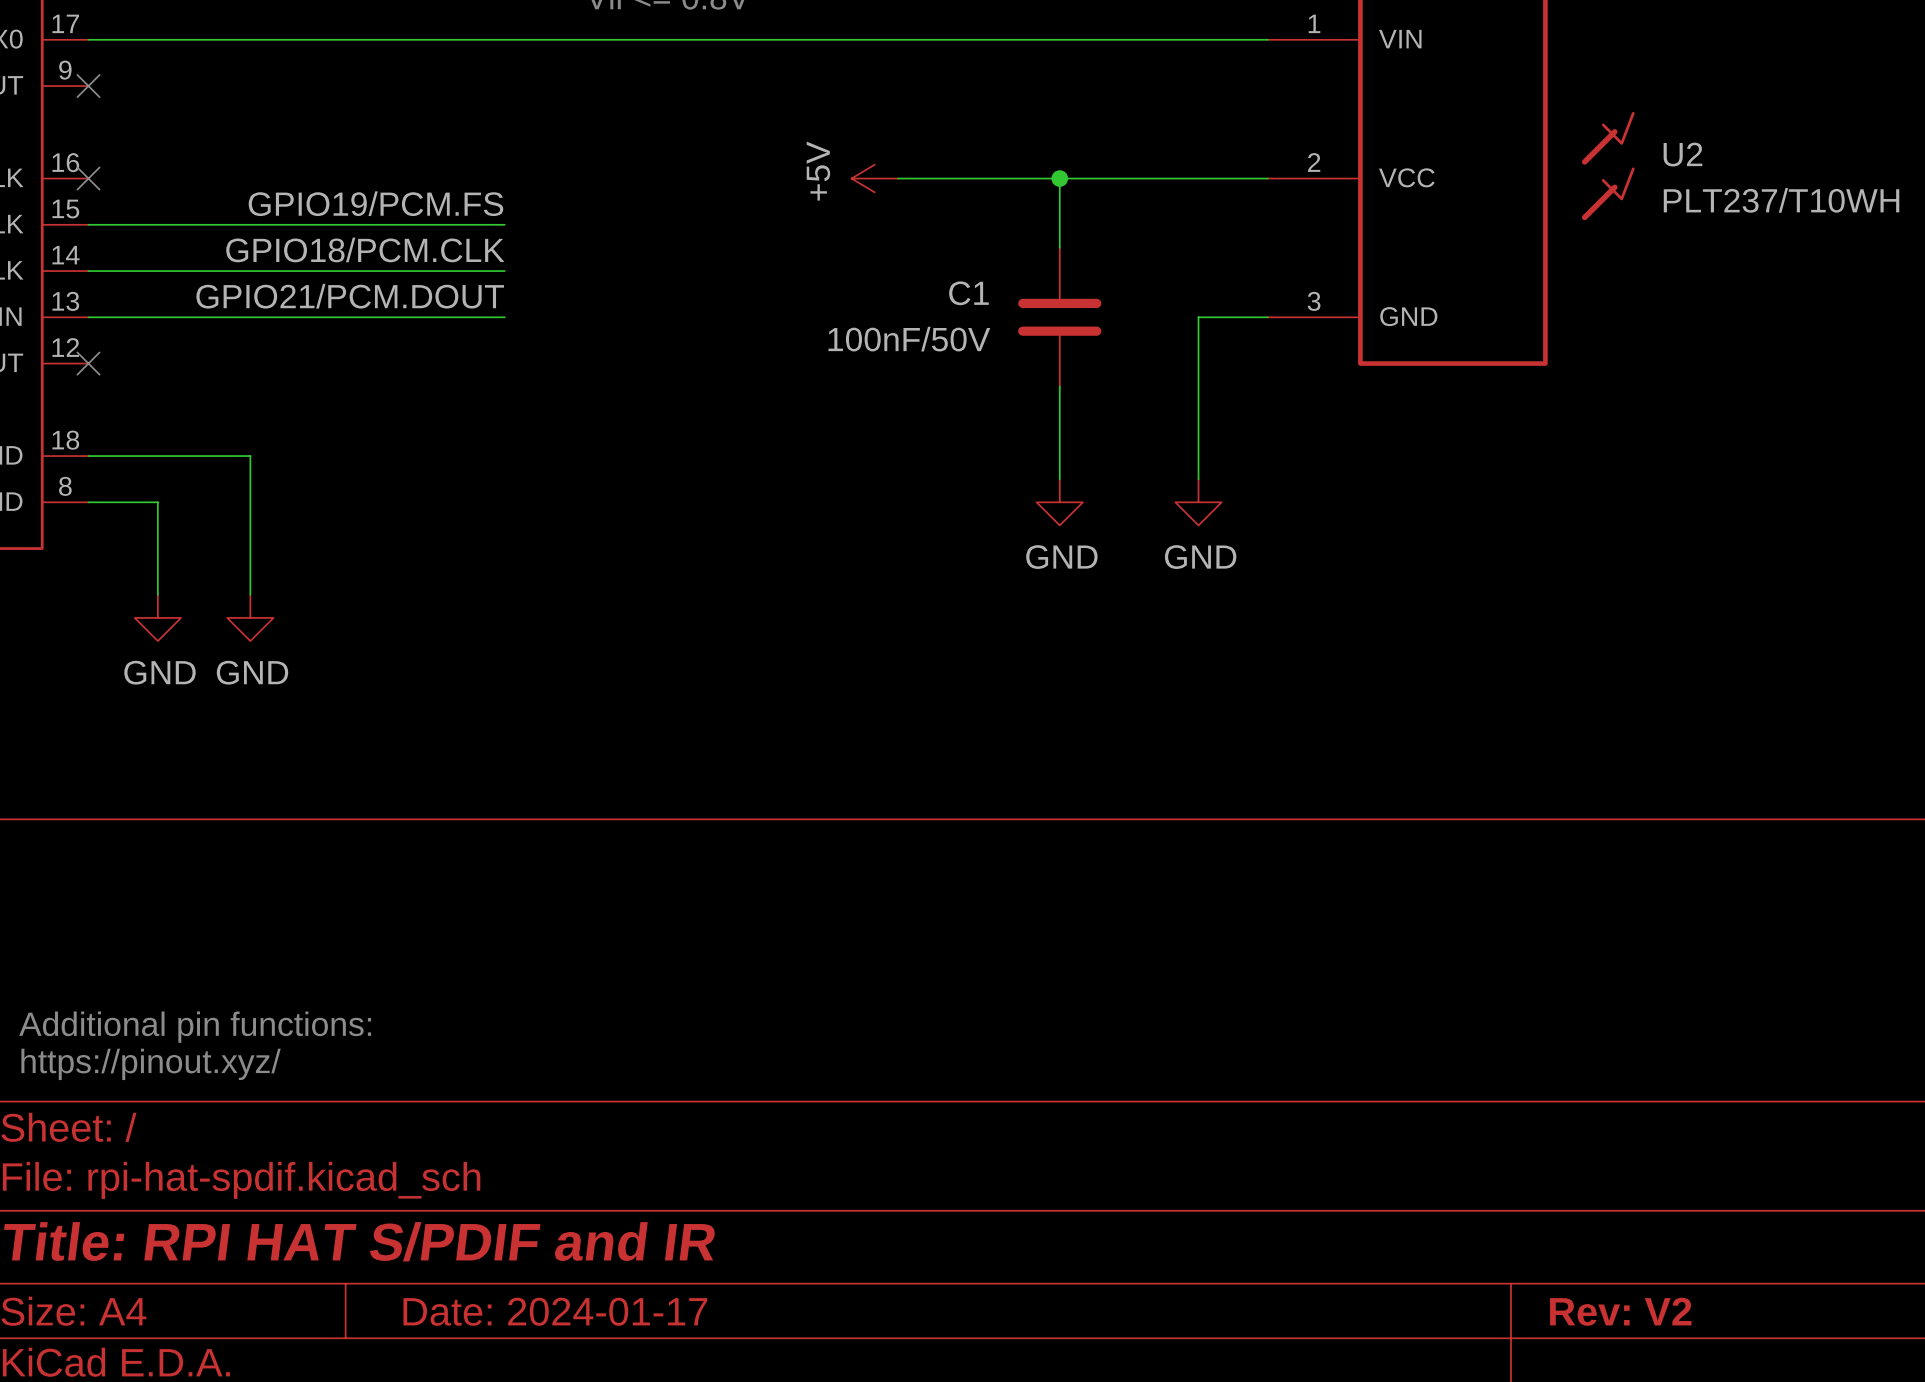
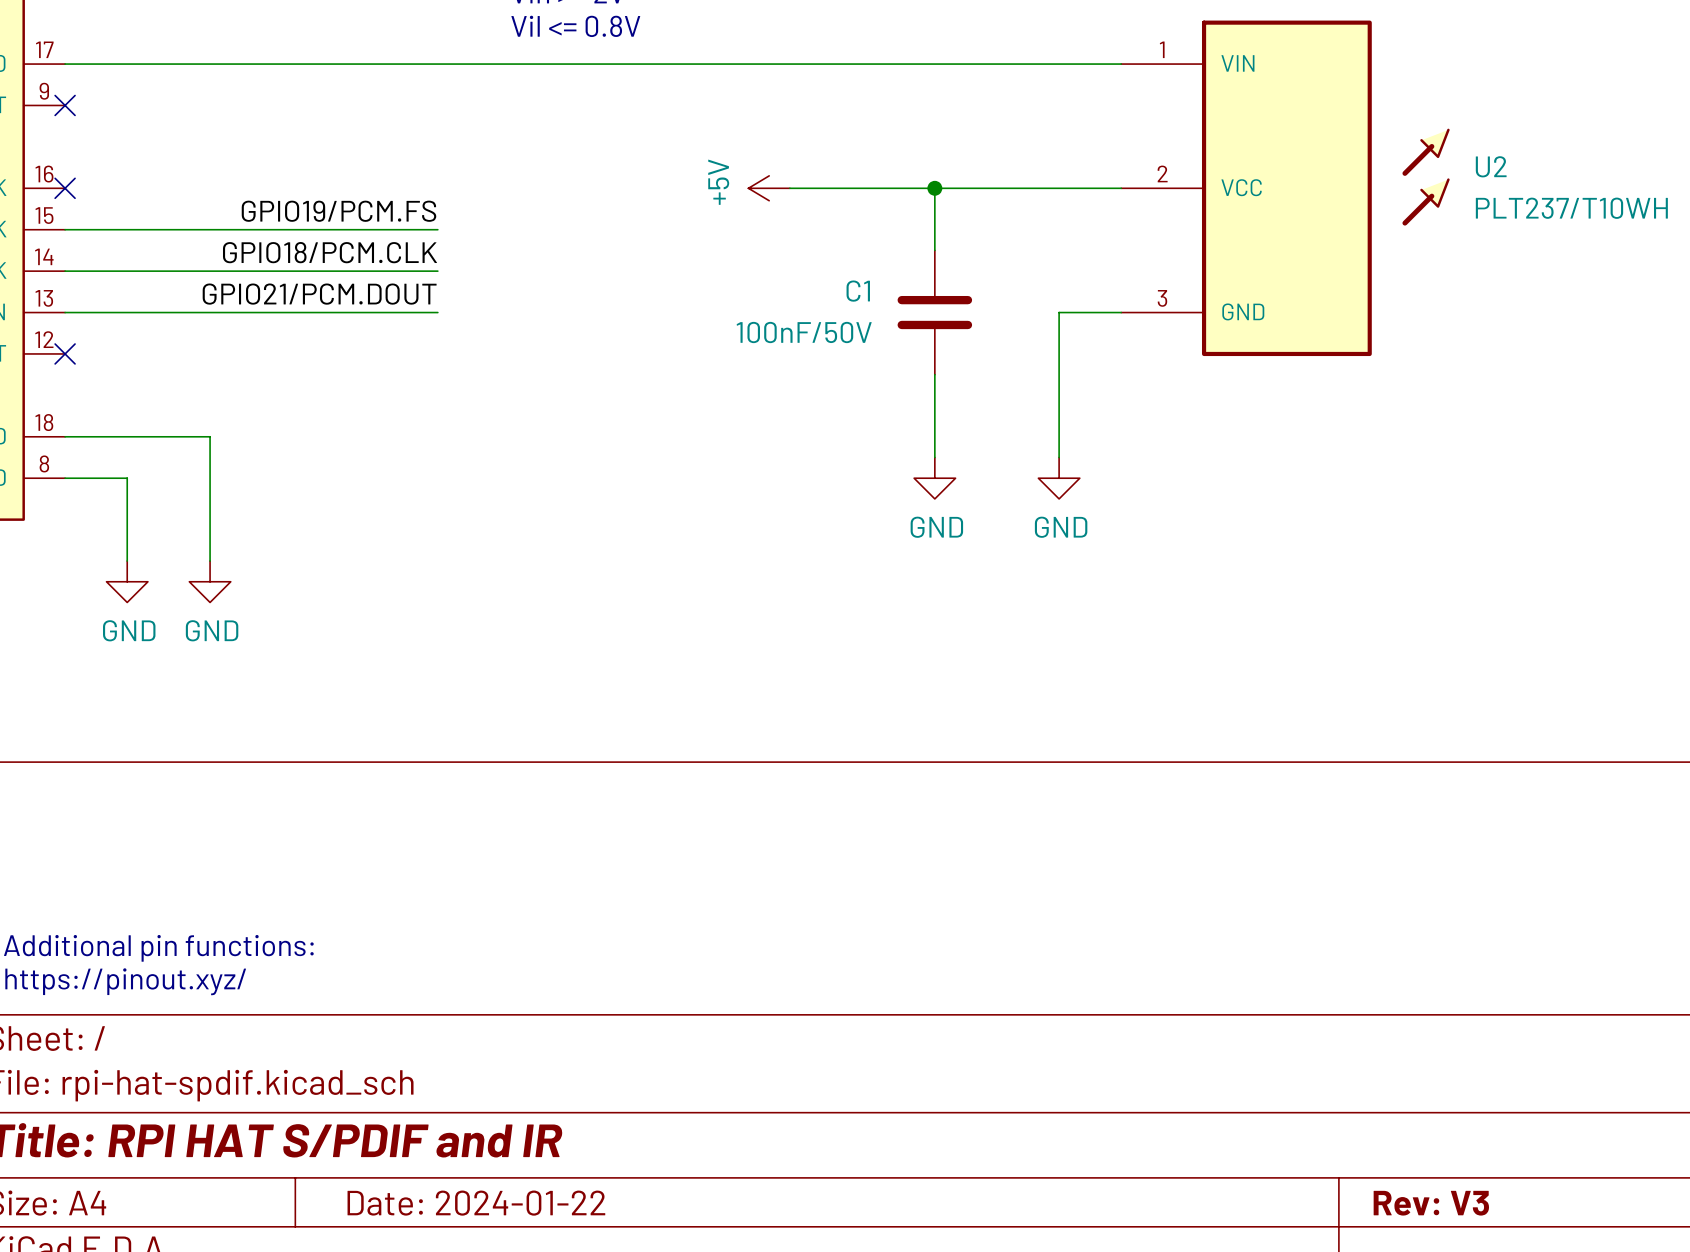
title block: Date: 2024-01-17 (555, 1311) -> Date: 2024-01-22 (476, 1203)
title block: Rev: V2 (1620, 1311) -> Rev: V3 (1431, 1203)

